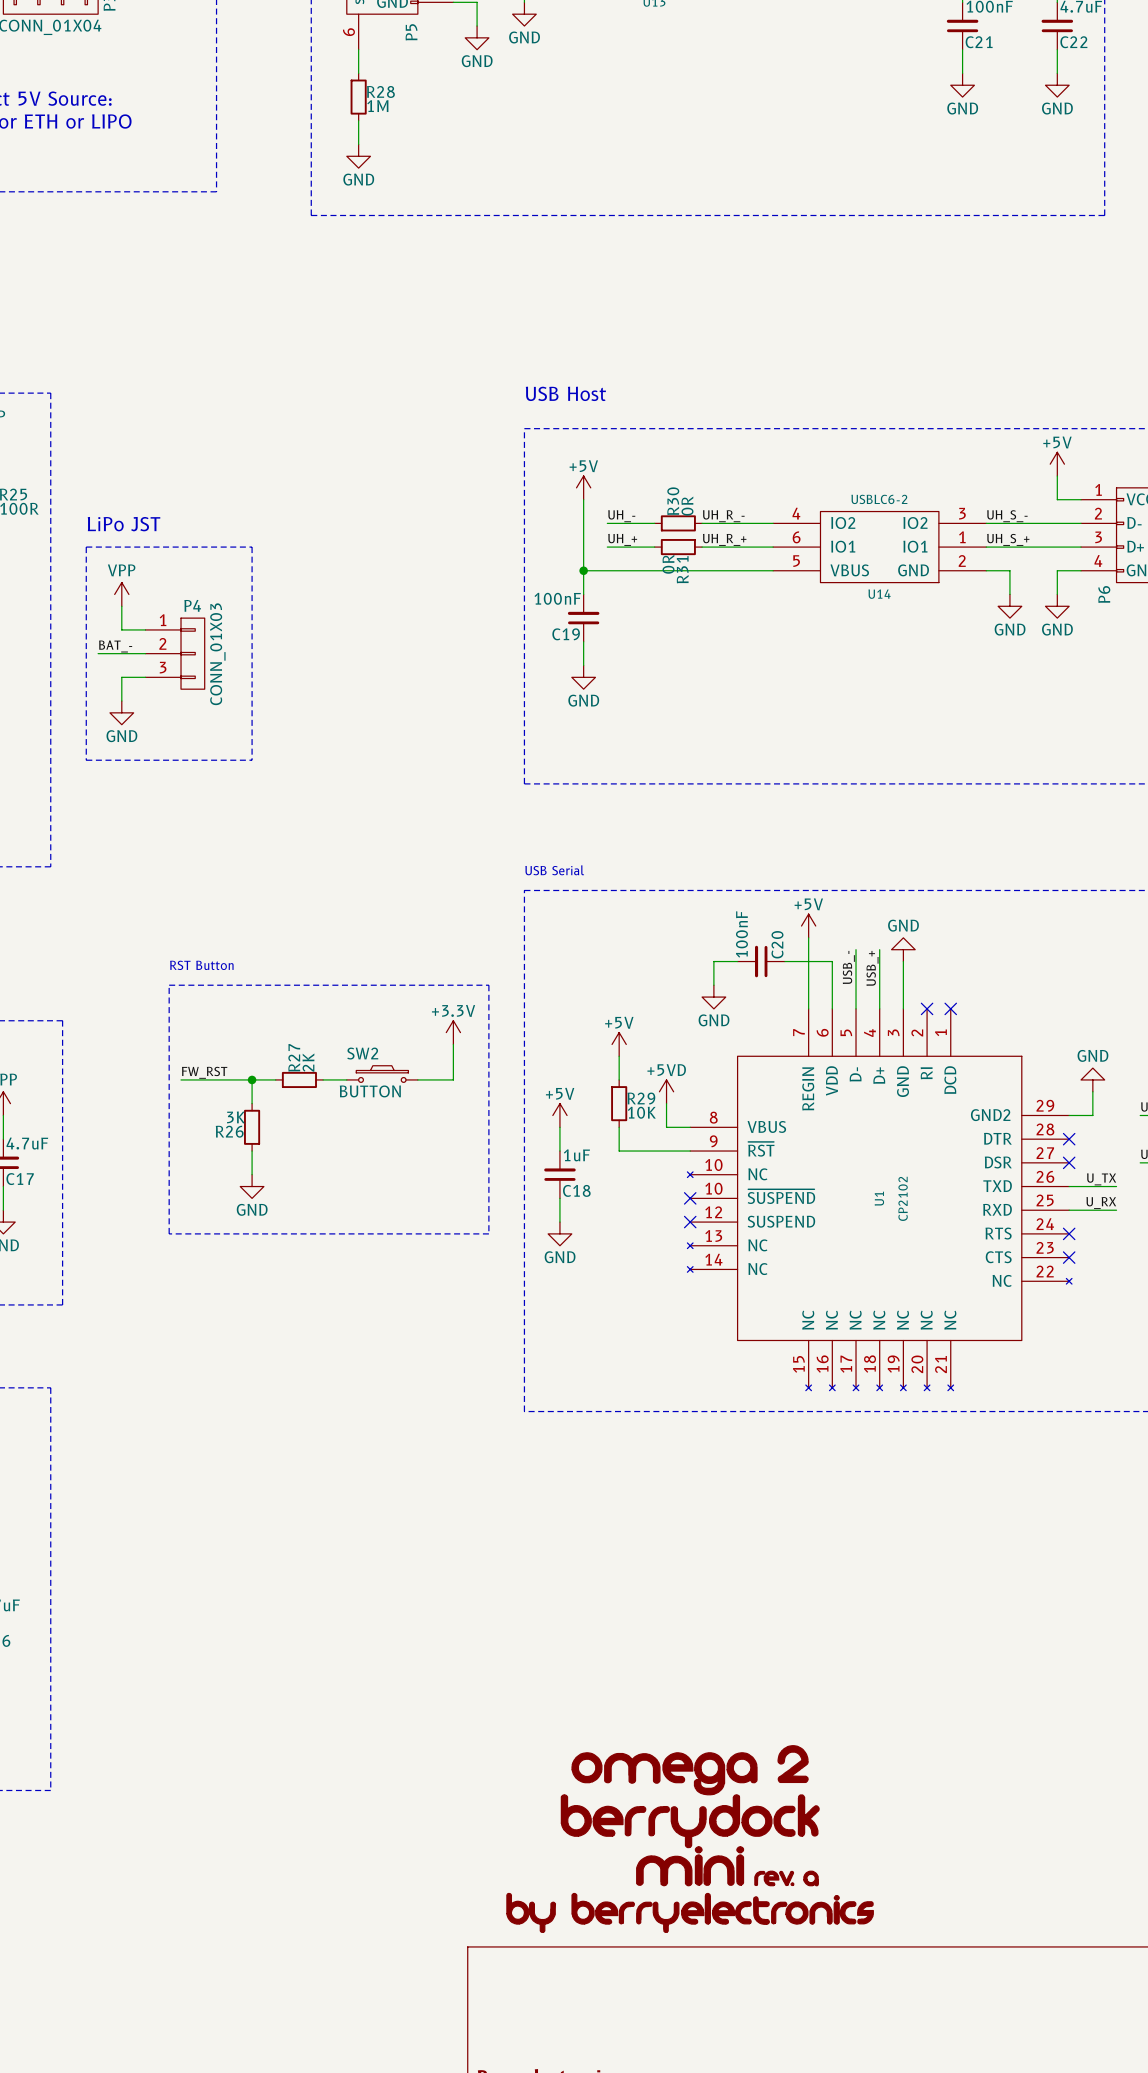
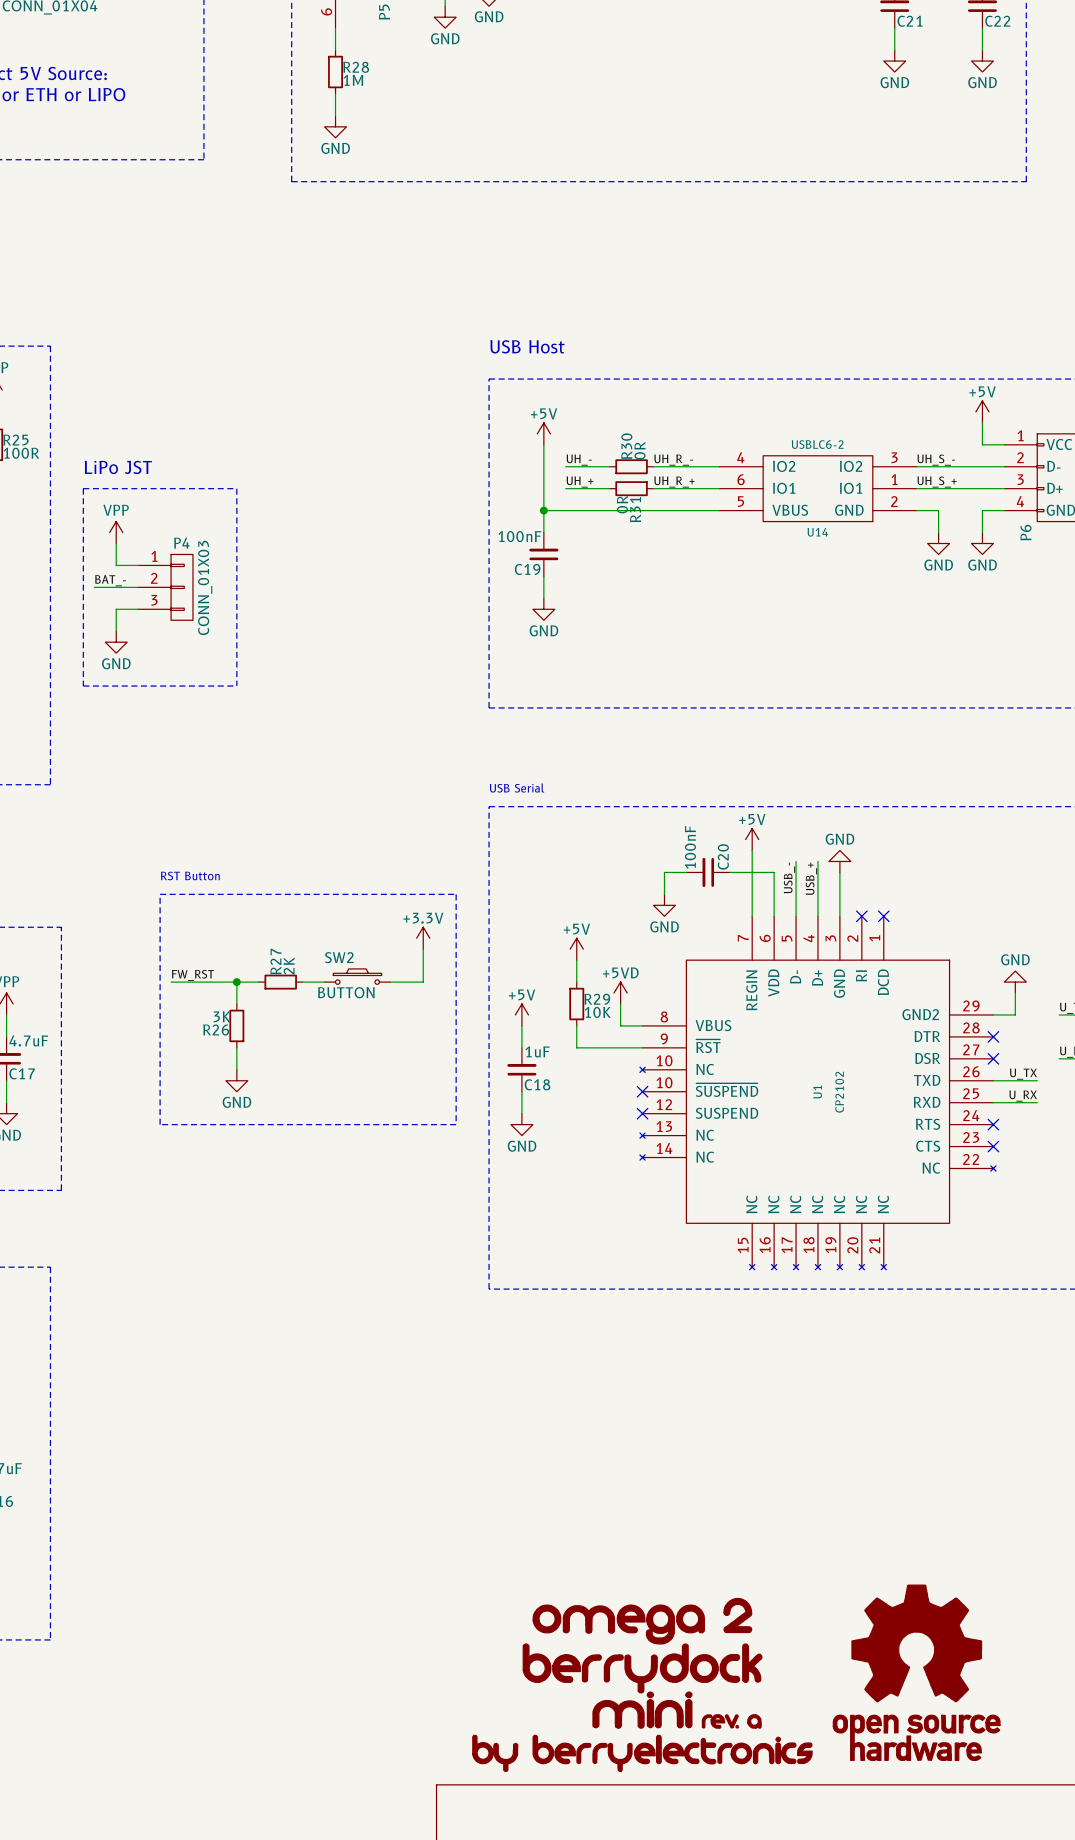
part: none -> (916, 1672)

